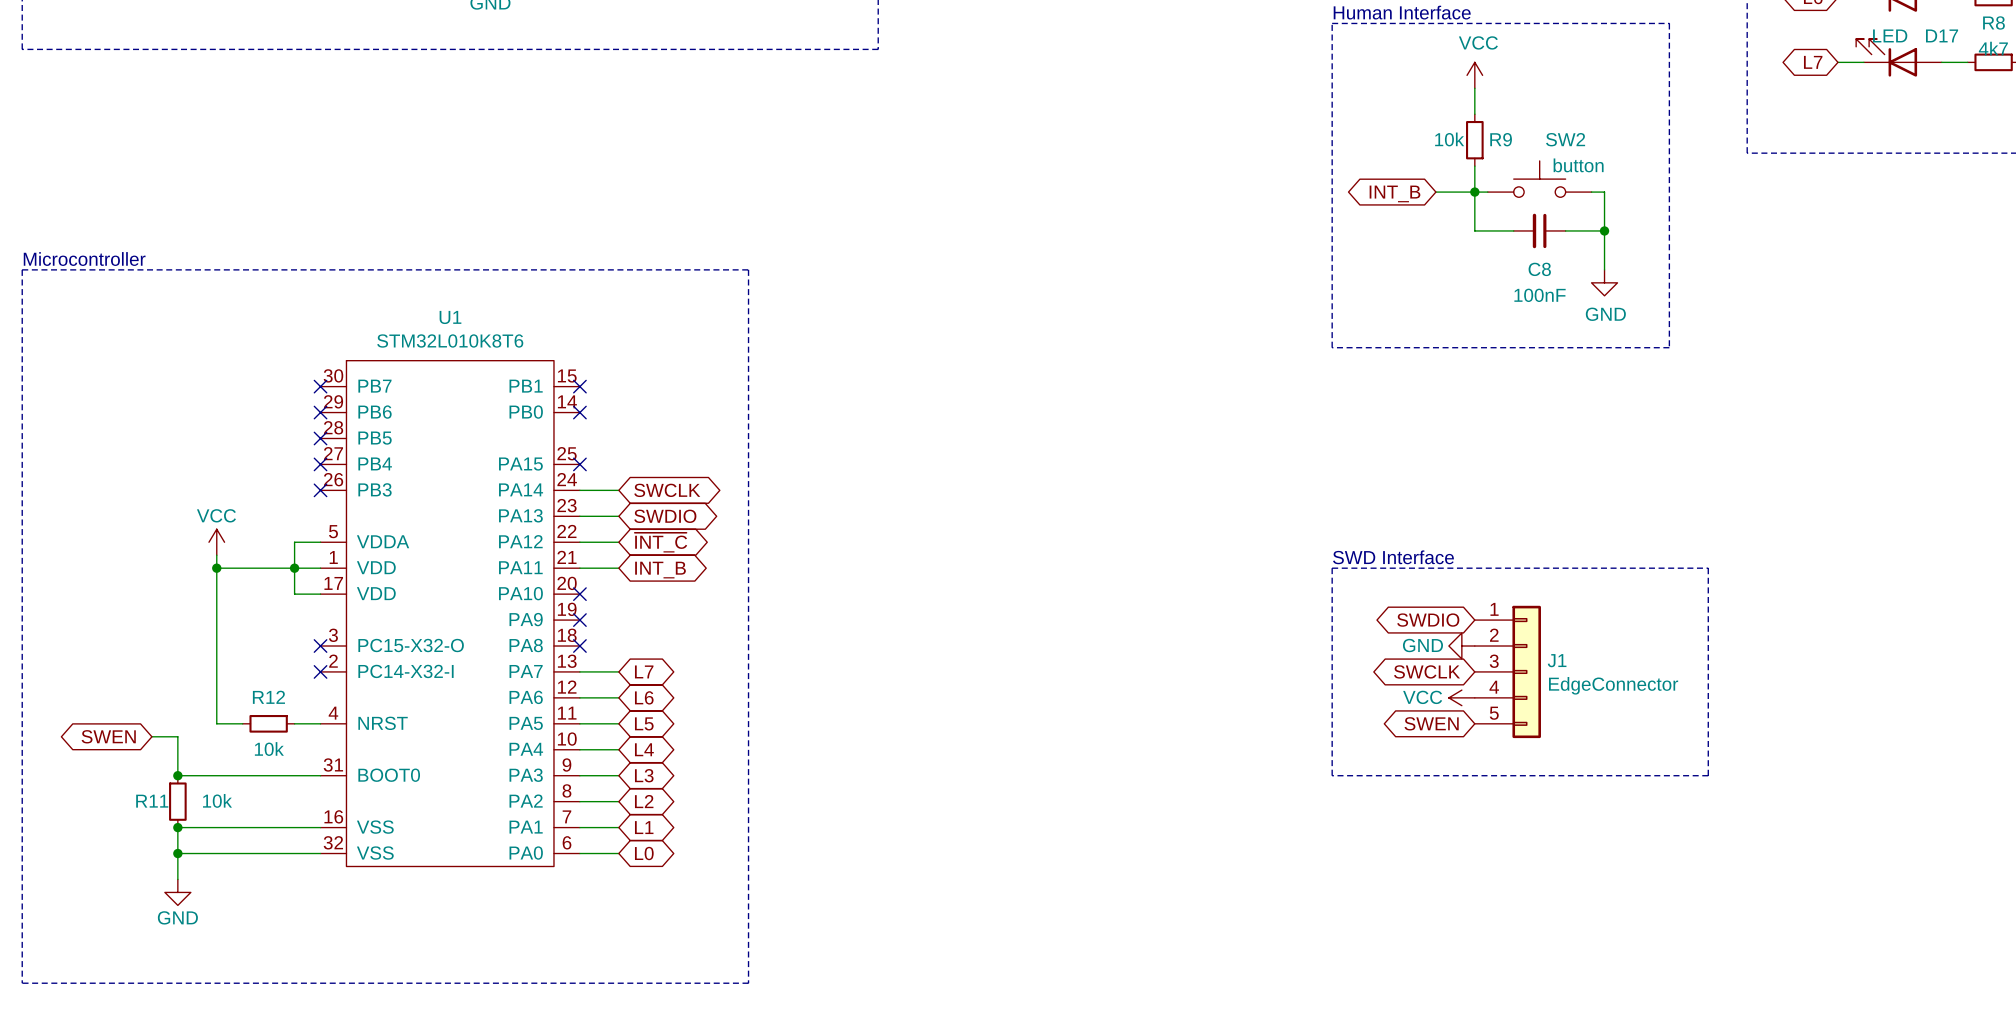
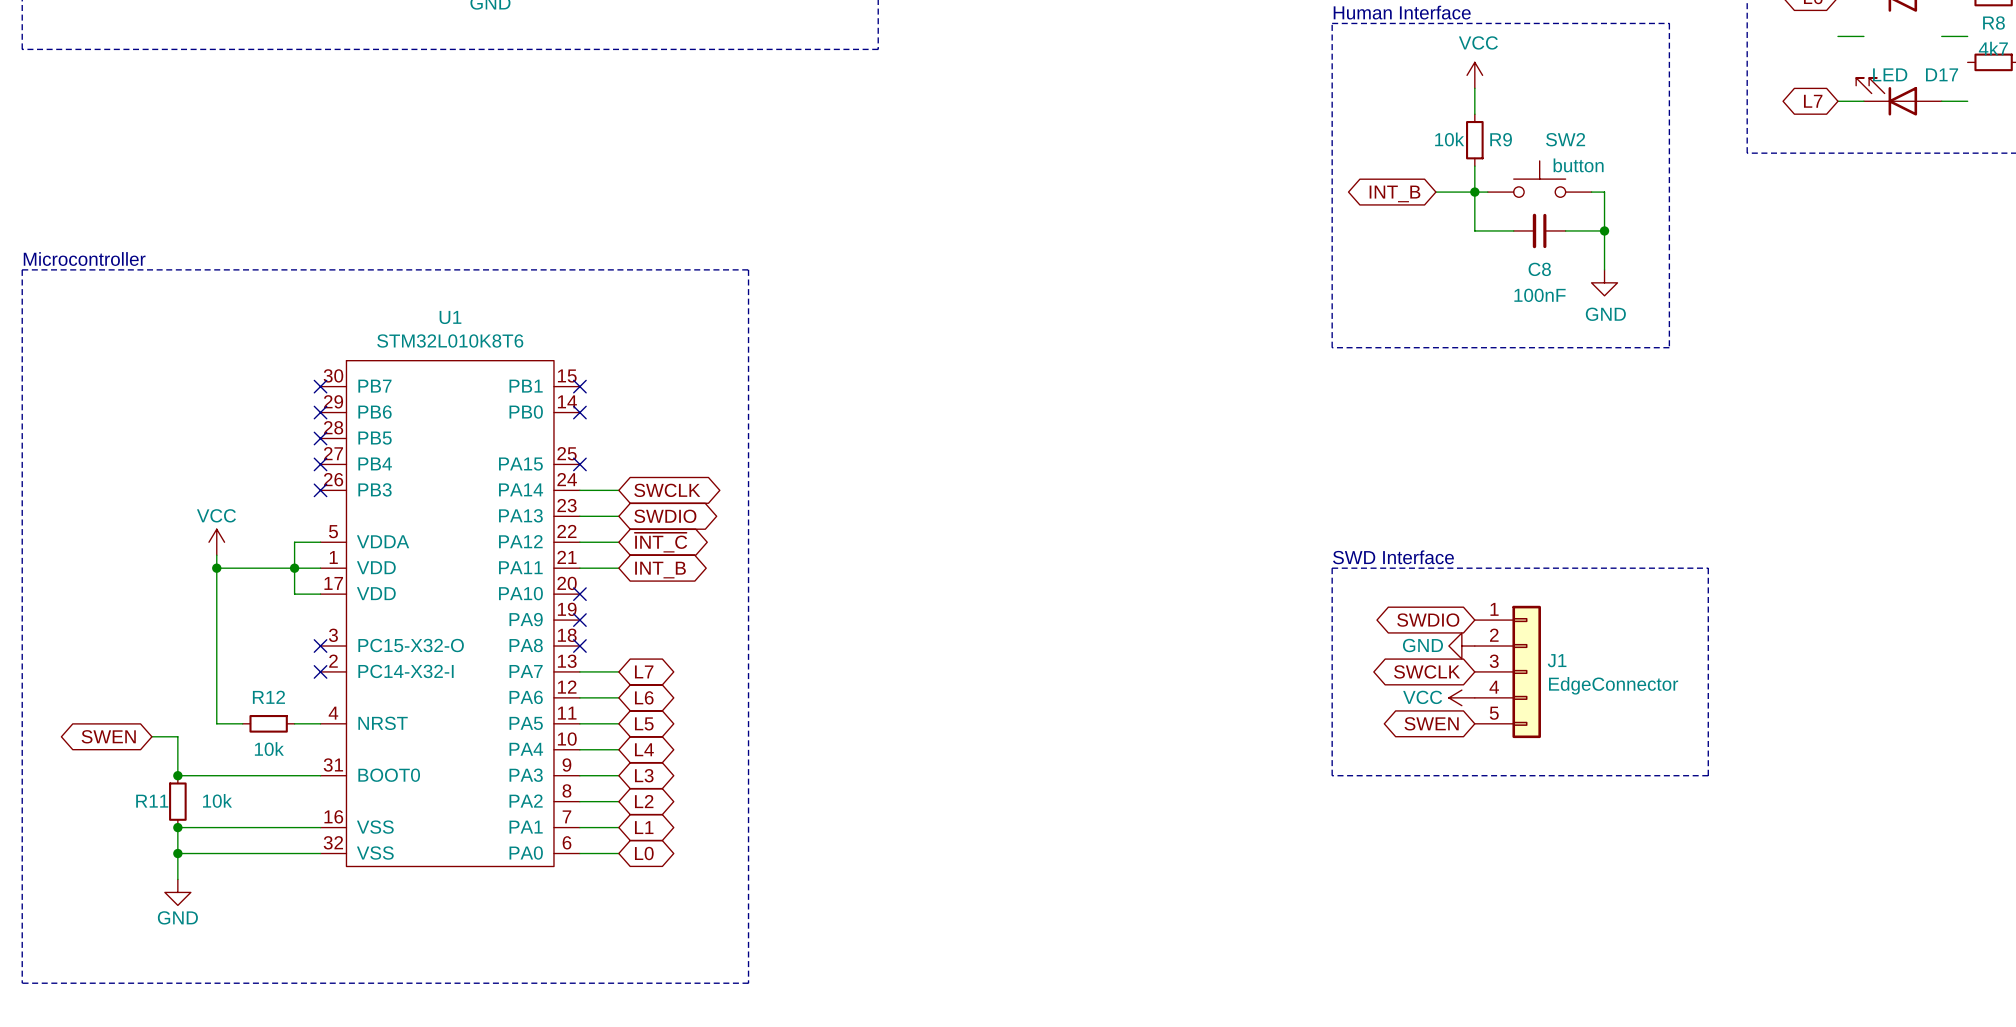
D17 position: (1898, 57) -> (1898, 96)
global label position: L7 (1813, 62) -> L7 (1813, 101)
wire: (1837, 62) (1863, 62) -> (1837, 36) (1863, 36)
wire: (1941, 62) (1967, 62) -> (1941, 36) (1967, 36)
wire: none -> (1837, 101) (1863, 101)
wire: none -> (1941, 101) (1967, 101)

